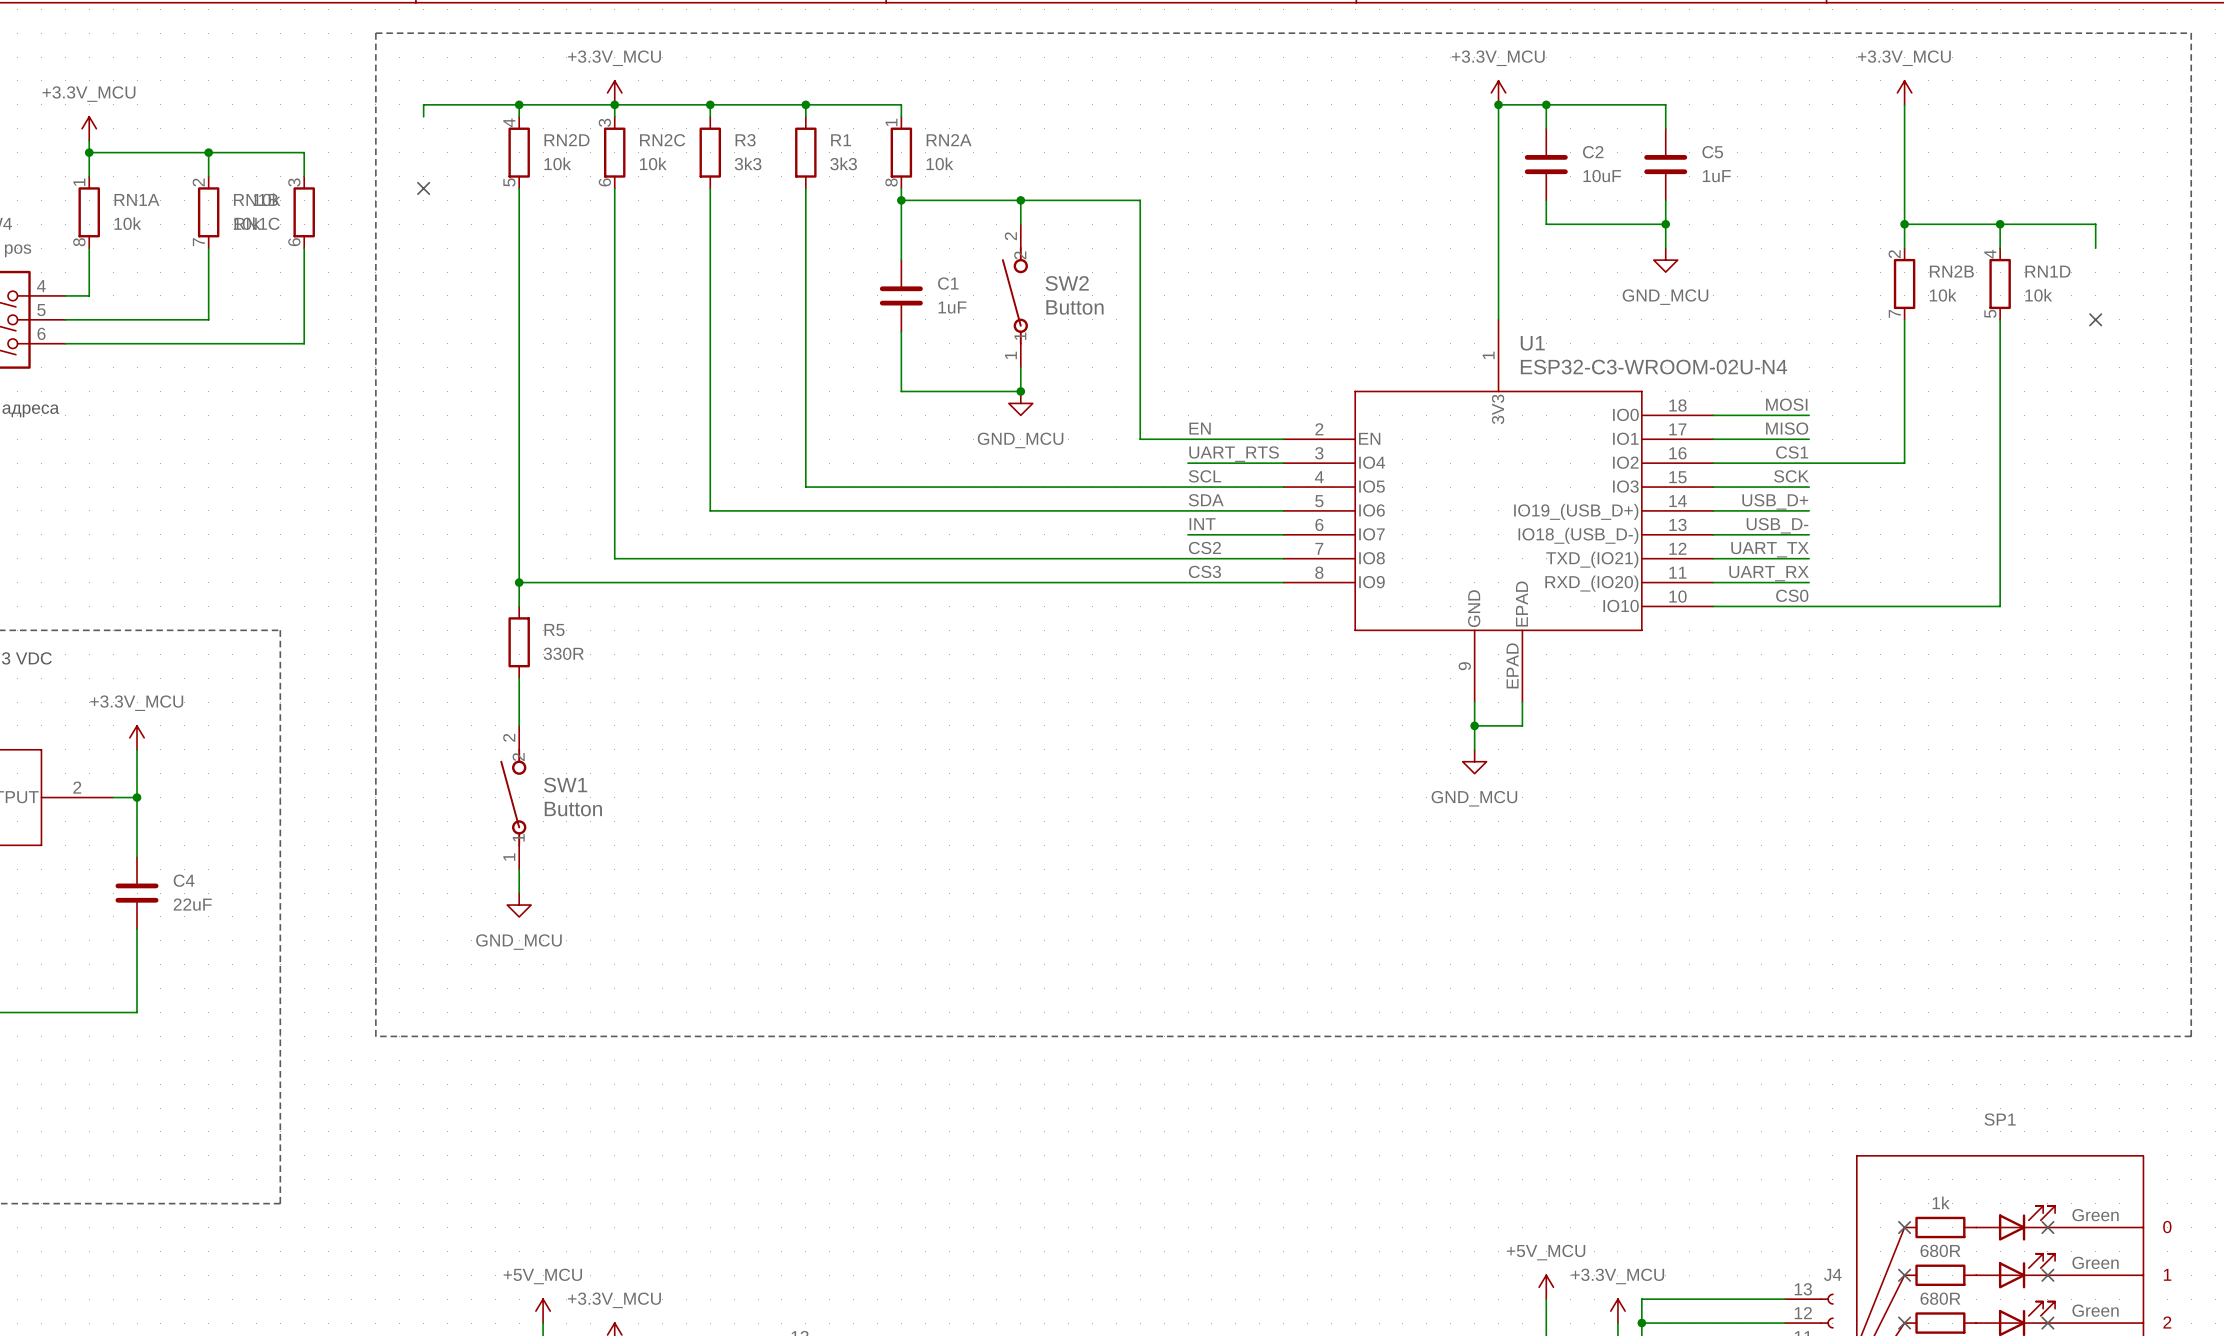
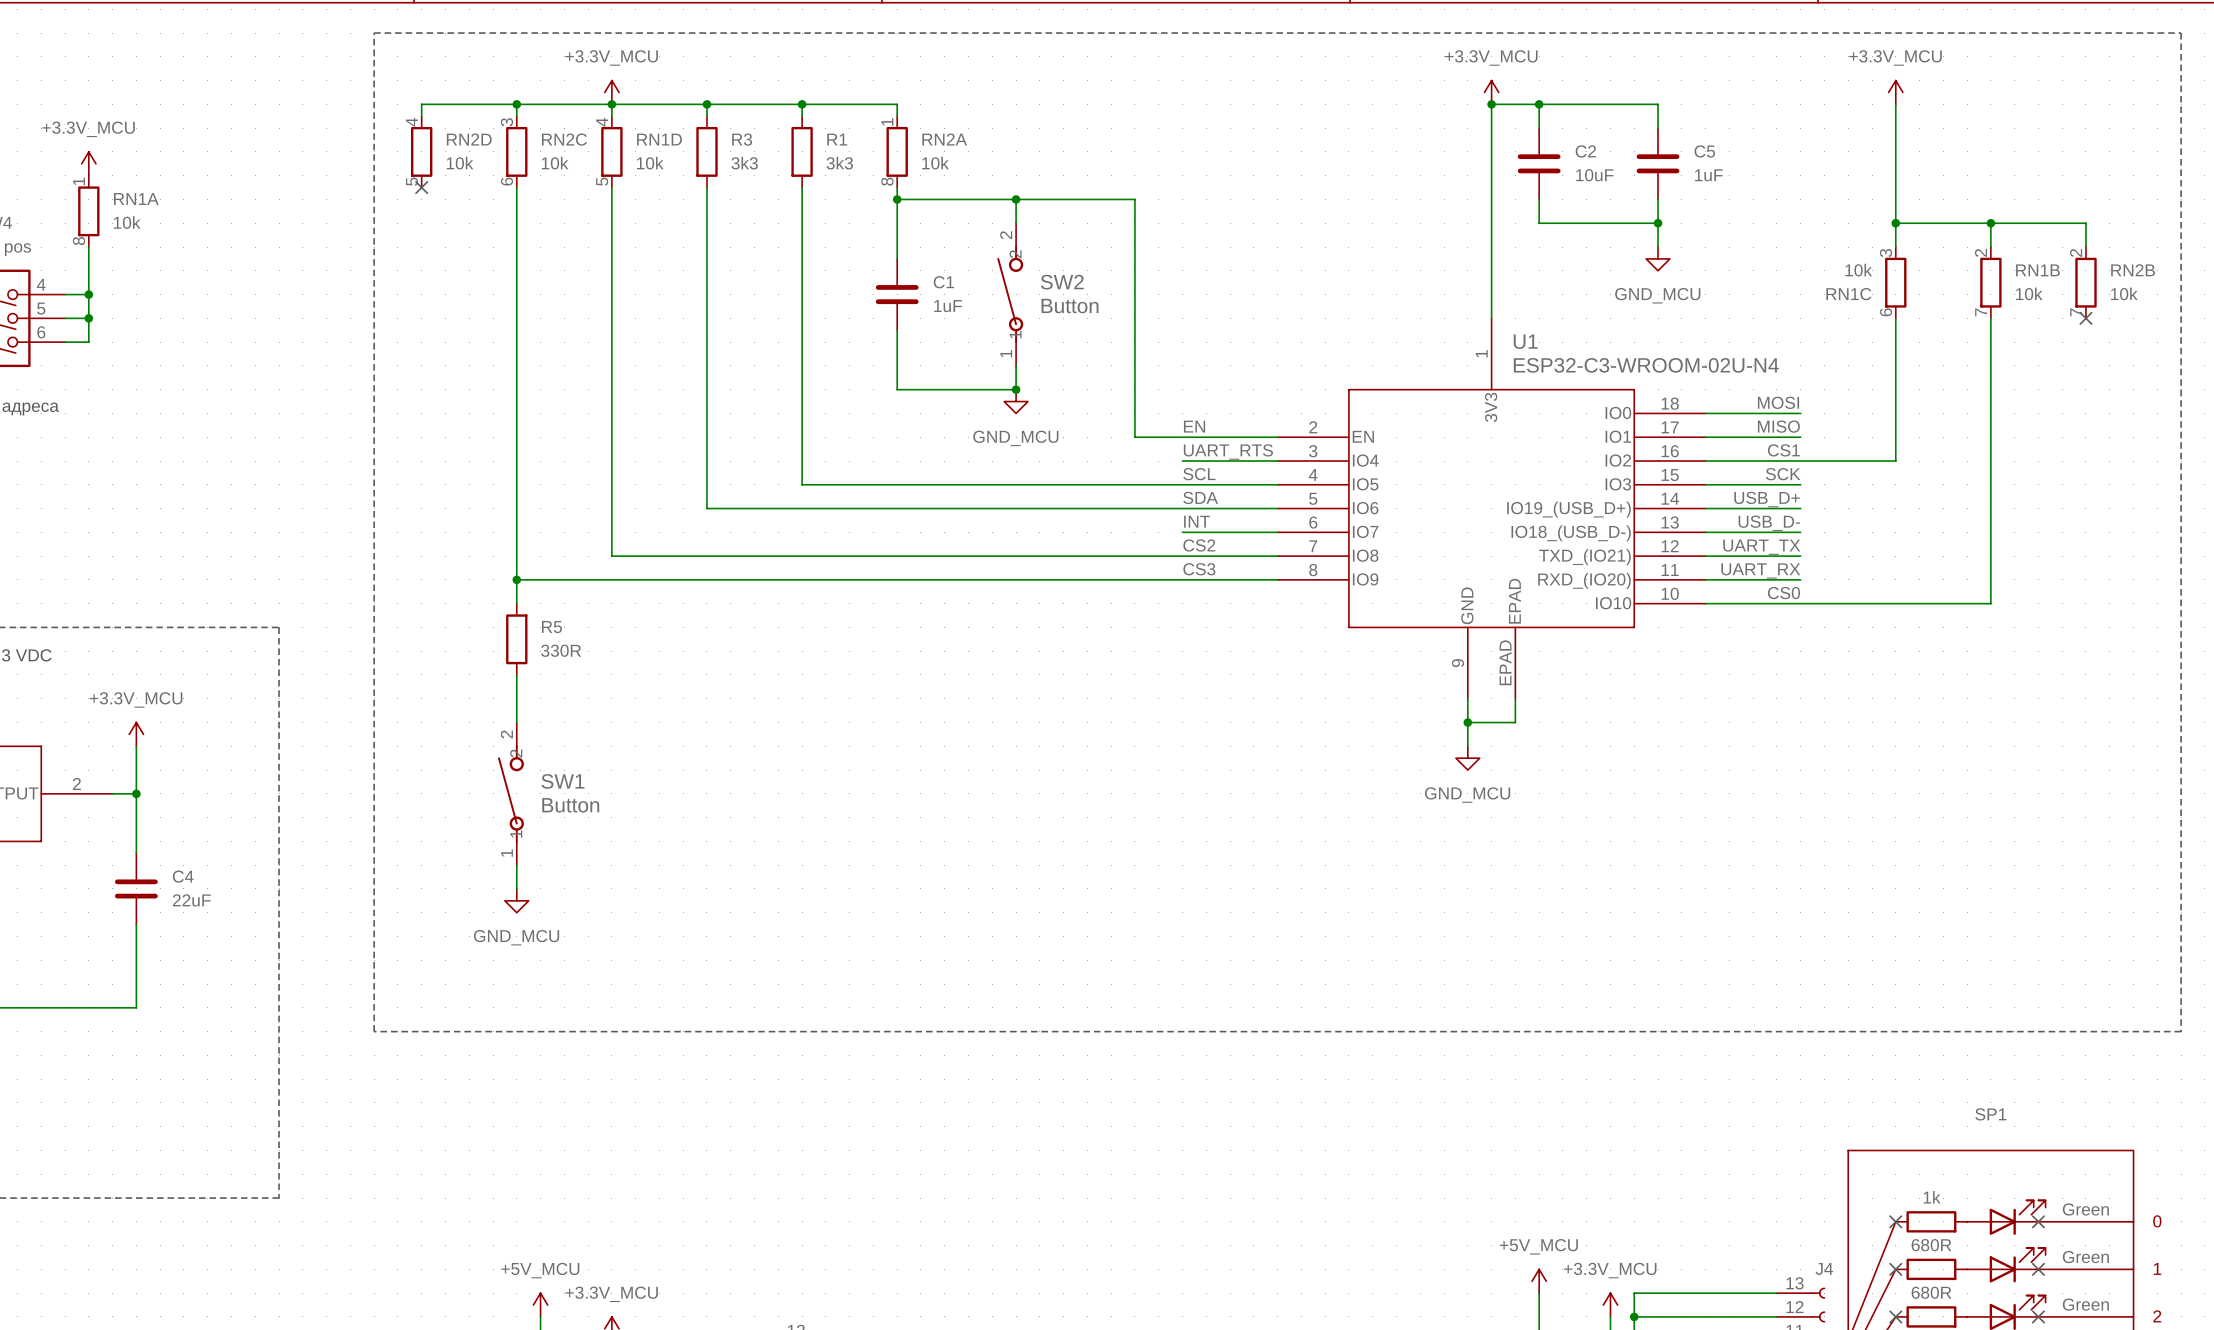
power symbol position: +3.3V_MCU (89, 128) -> +3.3V_MCU (88, 163)
wire: (89, 152) (304, 152) (304, 176) -> none
junction: (89, 152) -> none
wire: (208, 152) (208, 176) -> none
junction: (208, 152) -> none
RN2D position: (519, 152) -> (421, 151)
RN2C position: (614, 152) -> (516, 151)
RN1B position: (208, 212) -> (1990, 282)
RN1C position: (304, 212) -> (1895, 282)
wire: (208, 248) (208, 319) (89, 319) -> none
wire: (304, 248) (304, 343) (89, 343) -> (88, 294) (88, 342)
RN2B position: (1904, 283) -> (2085, 282)
RN1D position: (2000, 283) -> (611, 151)
junction: none -> (88, 294)
junction: none -> (88, 318)

